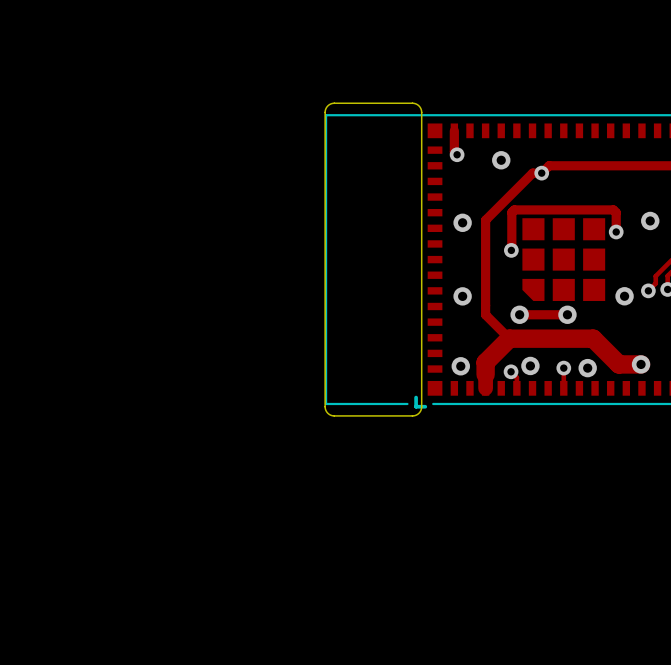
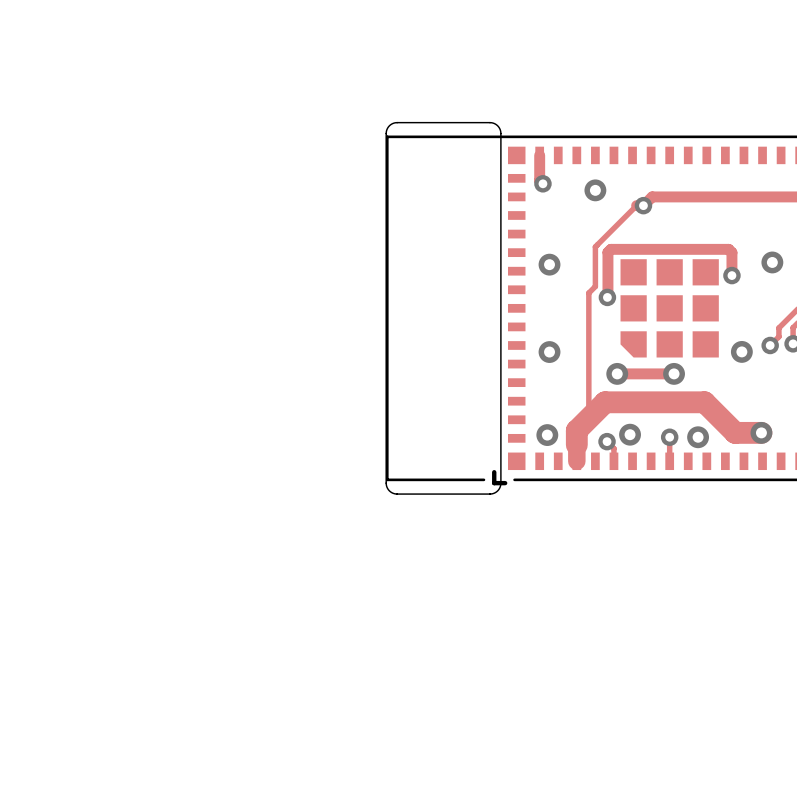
track: (535, 173) (532, 173) (485, 220) (485, 314) (509, 338) -> (636, 205) (595, 246) (595, 286) (588, 293) (588, 418) (576, 430)

